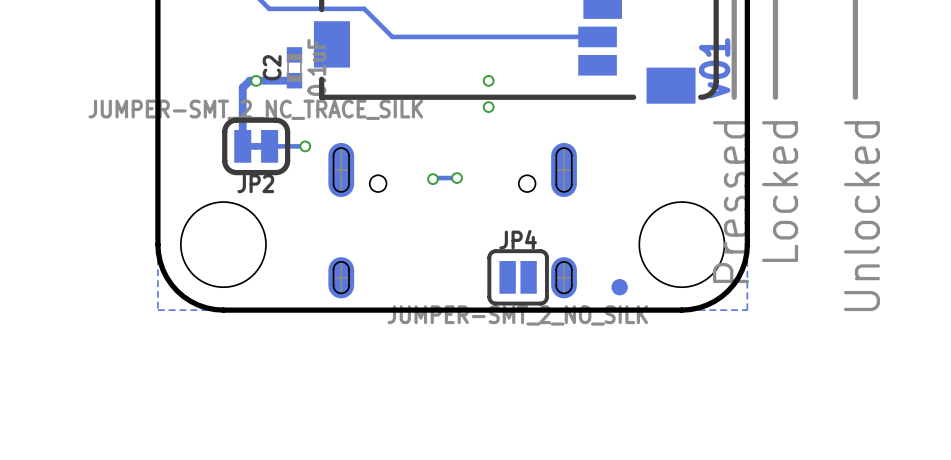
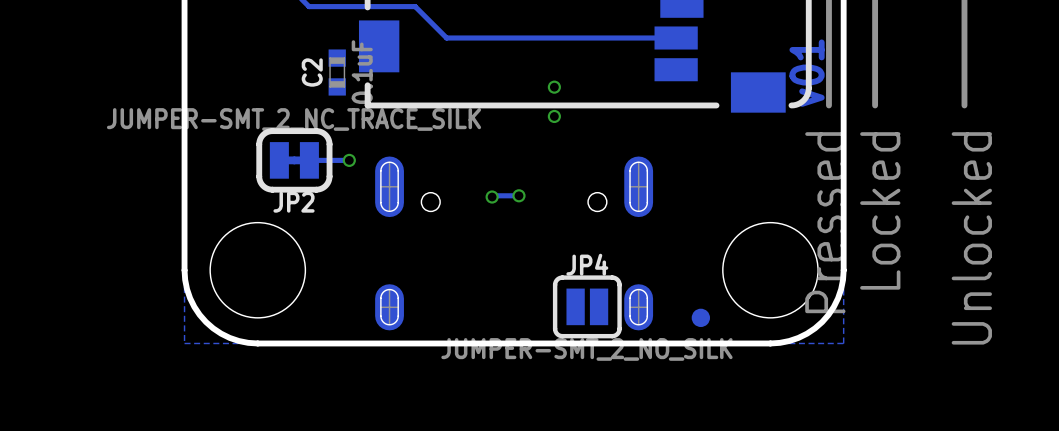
via: (256, 80) -> none
track: (294, 80) (249, 80) (242, 87) (242, 146) -> none

